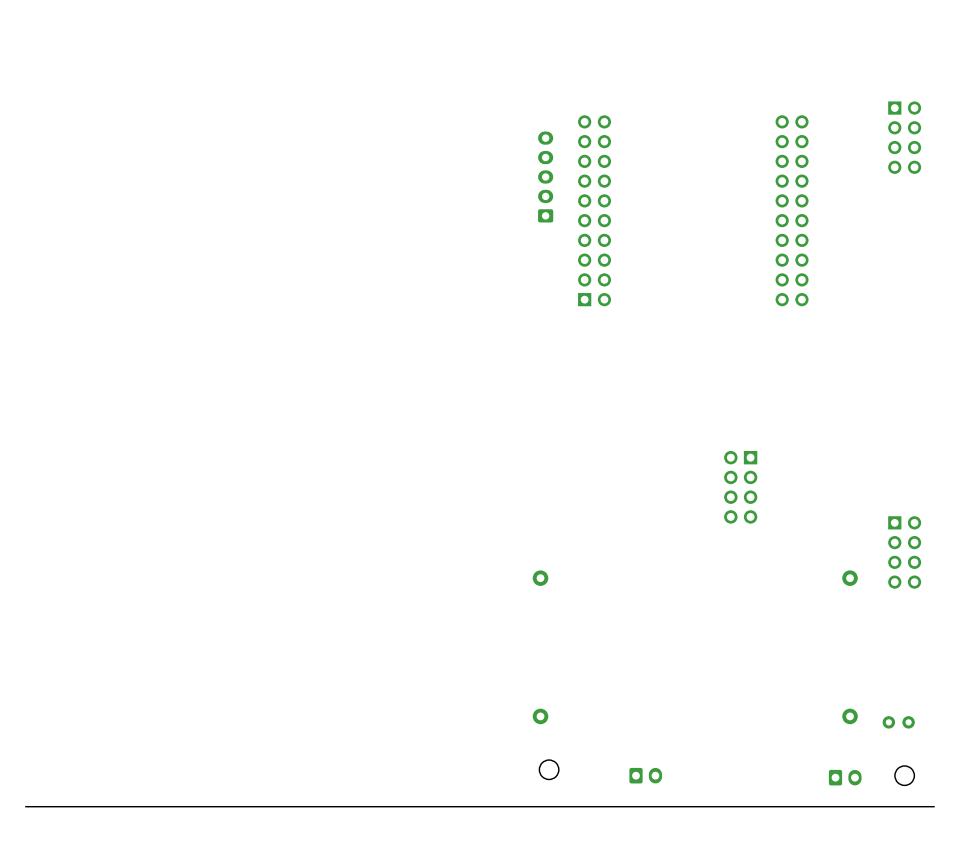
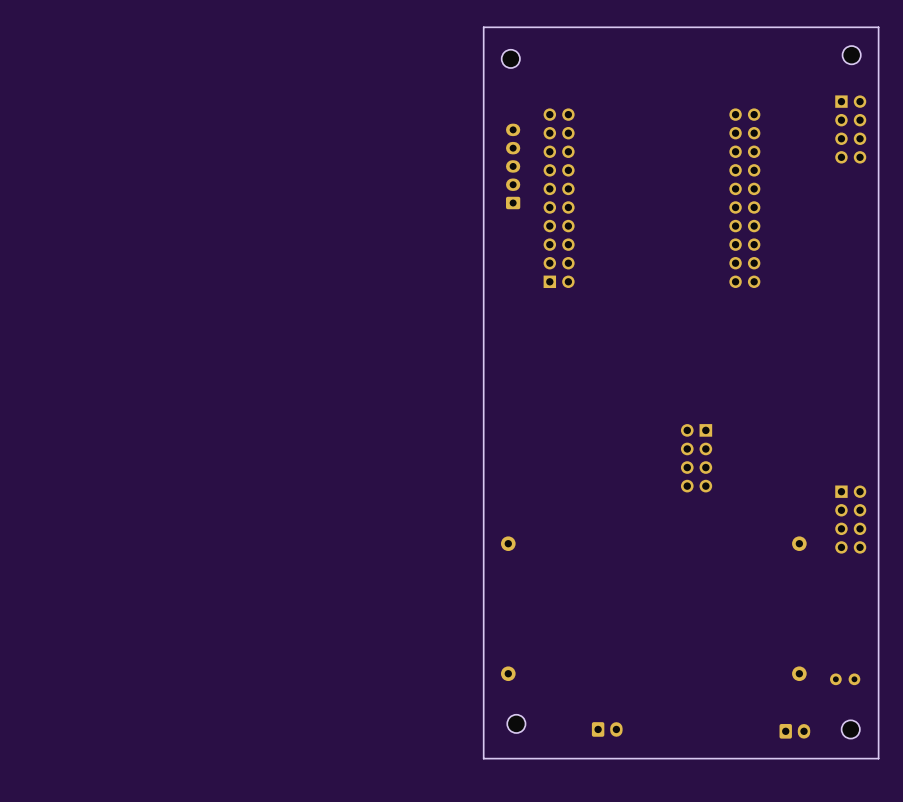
part: none -> (851, 55)
part: none -> (510, 58)
board edge: (514, 806) (25, 806) -> (483, 758) (483, 27) (878, 27) (878, 758)

